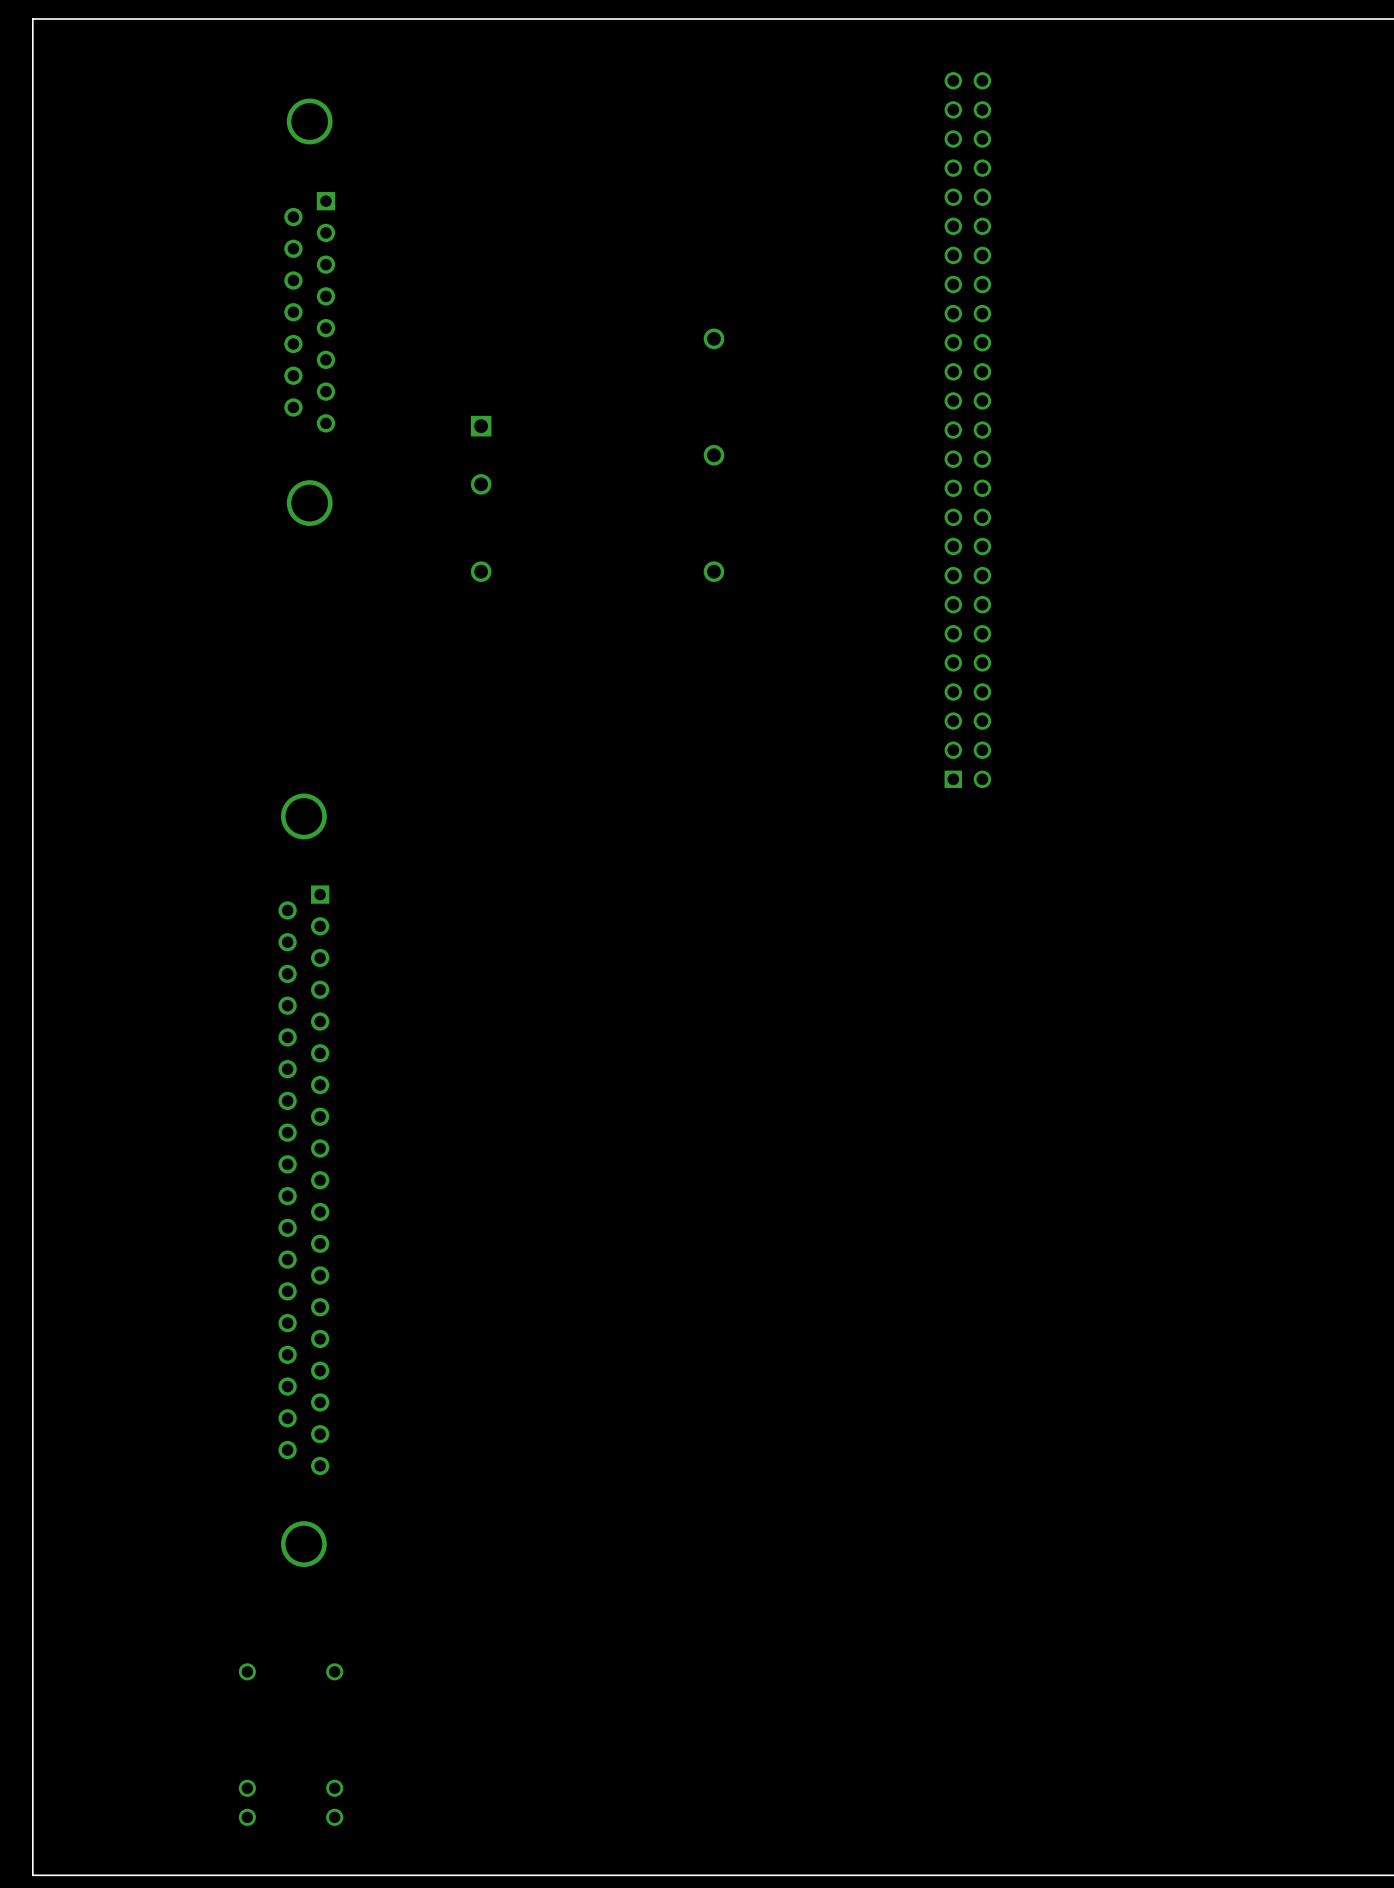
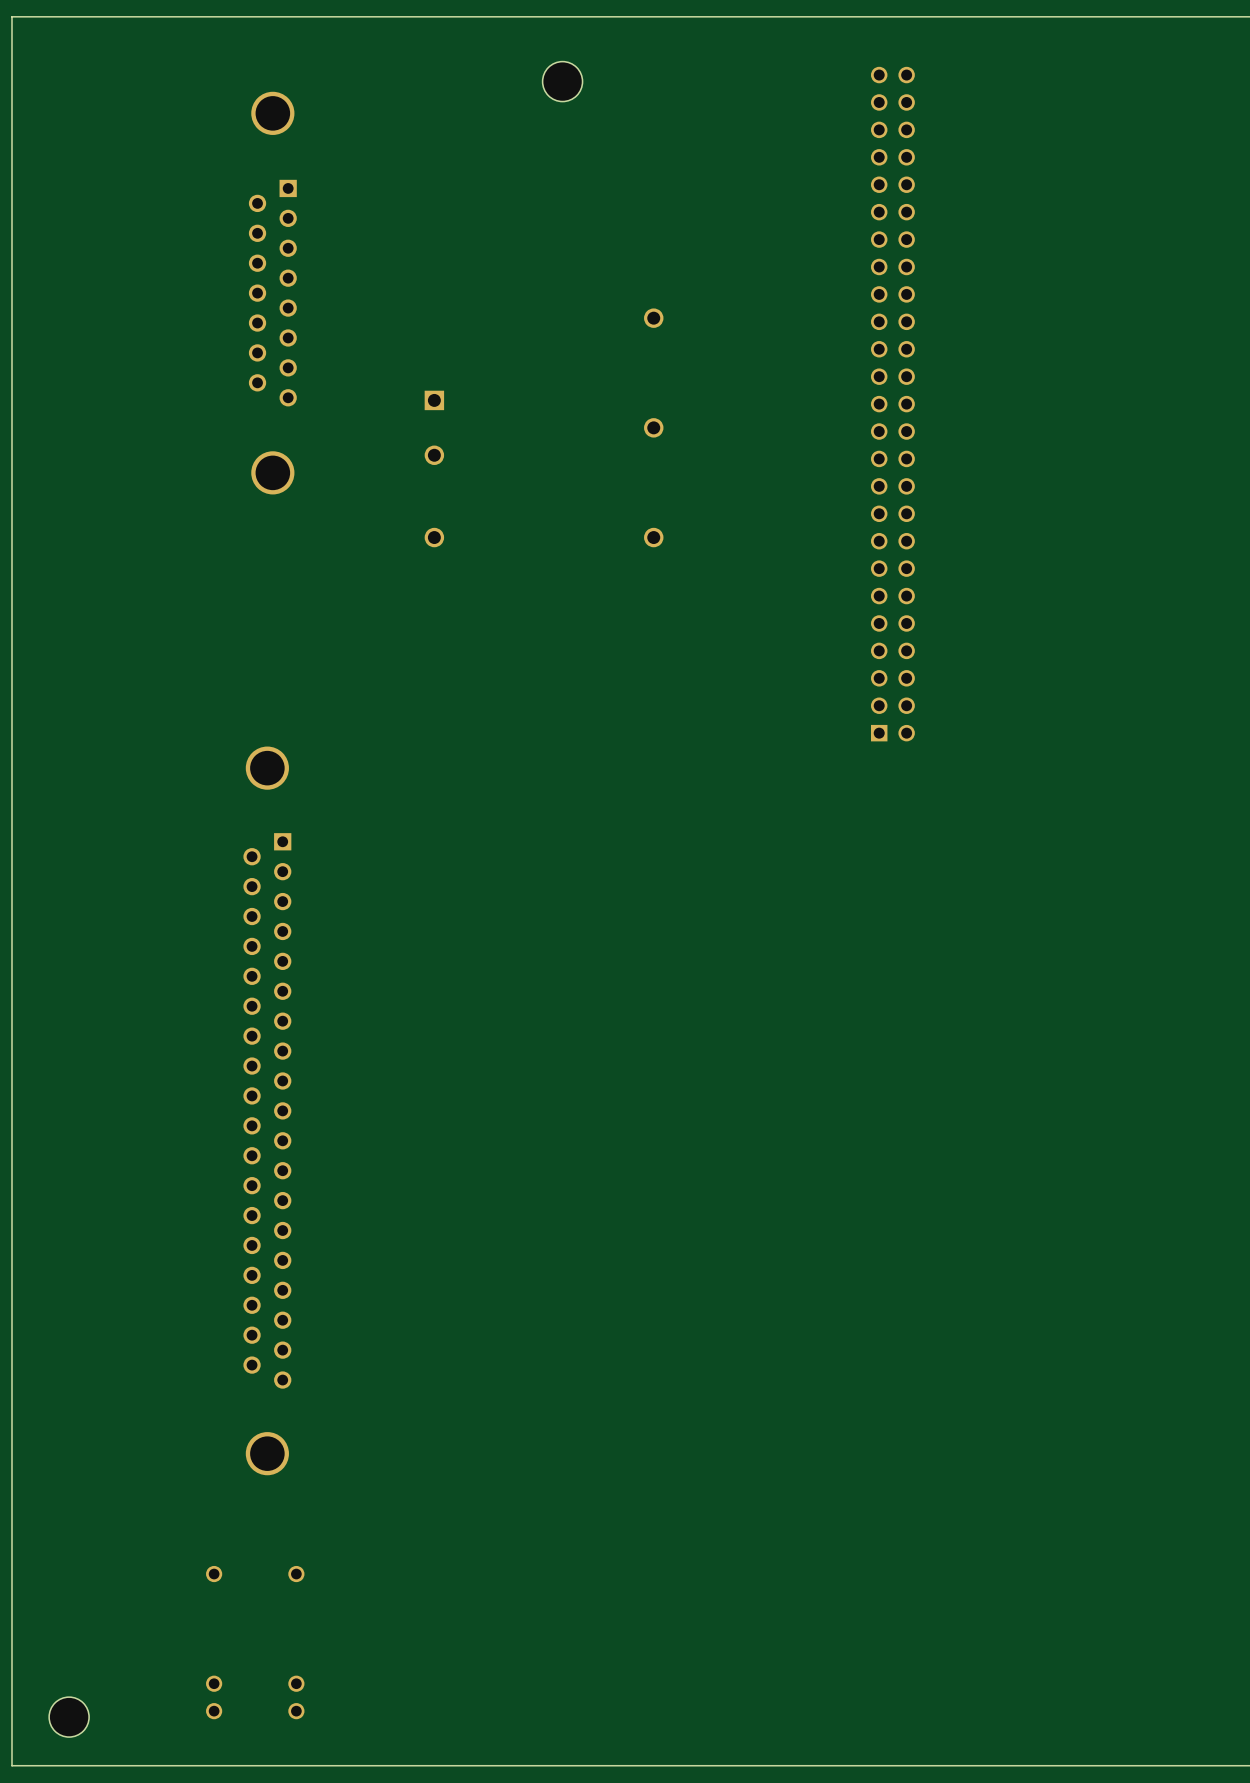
part: none -> (562, 81)
part: none -> (69, 1717)

